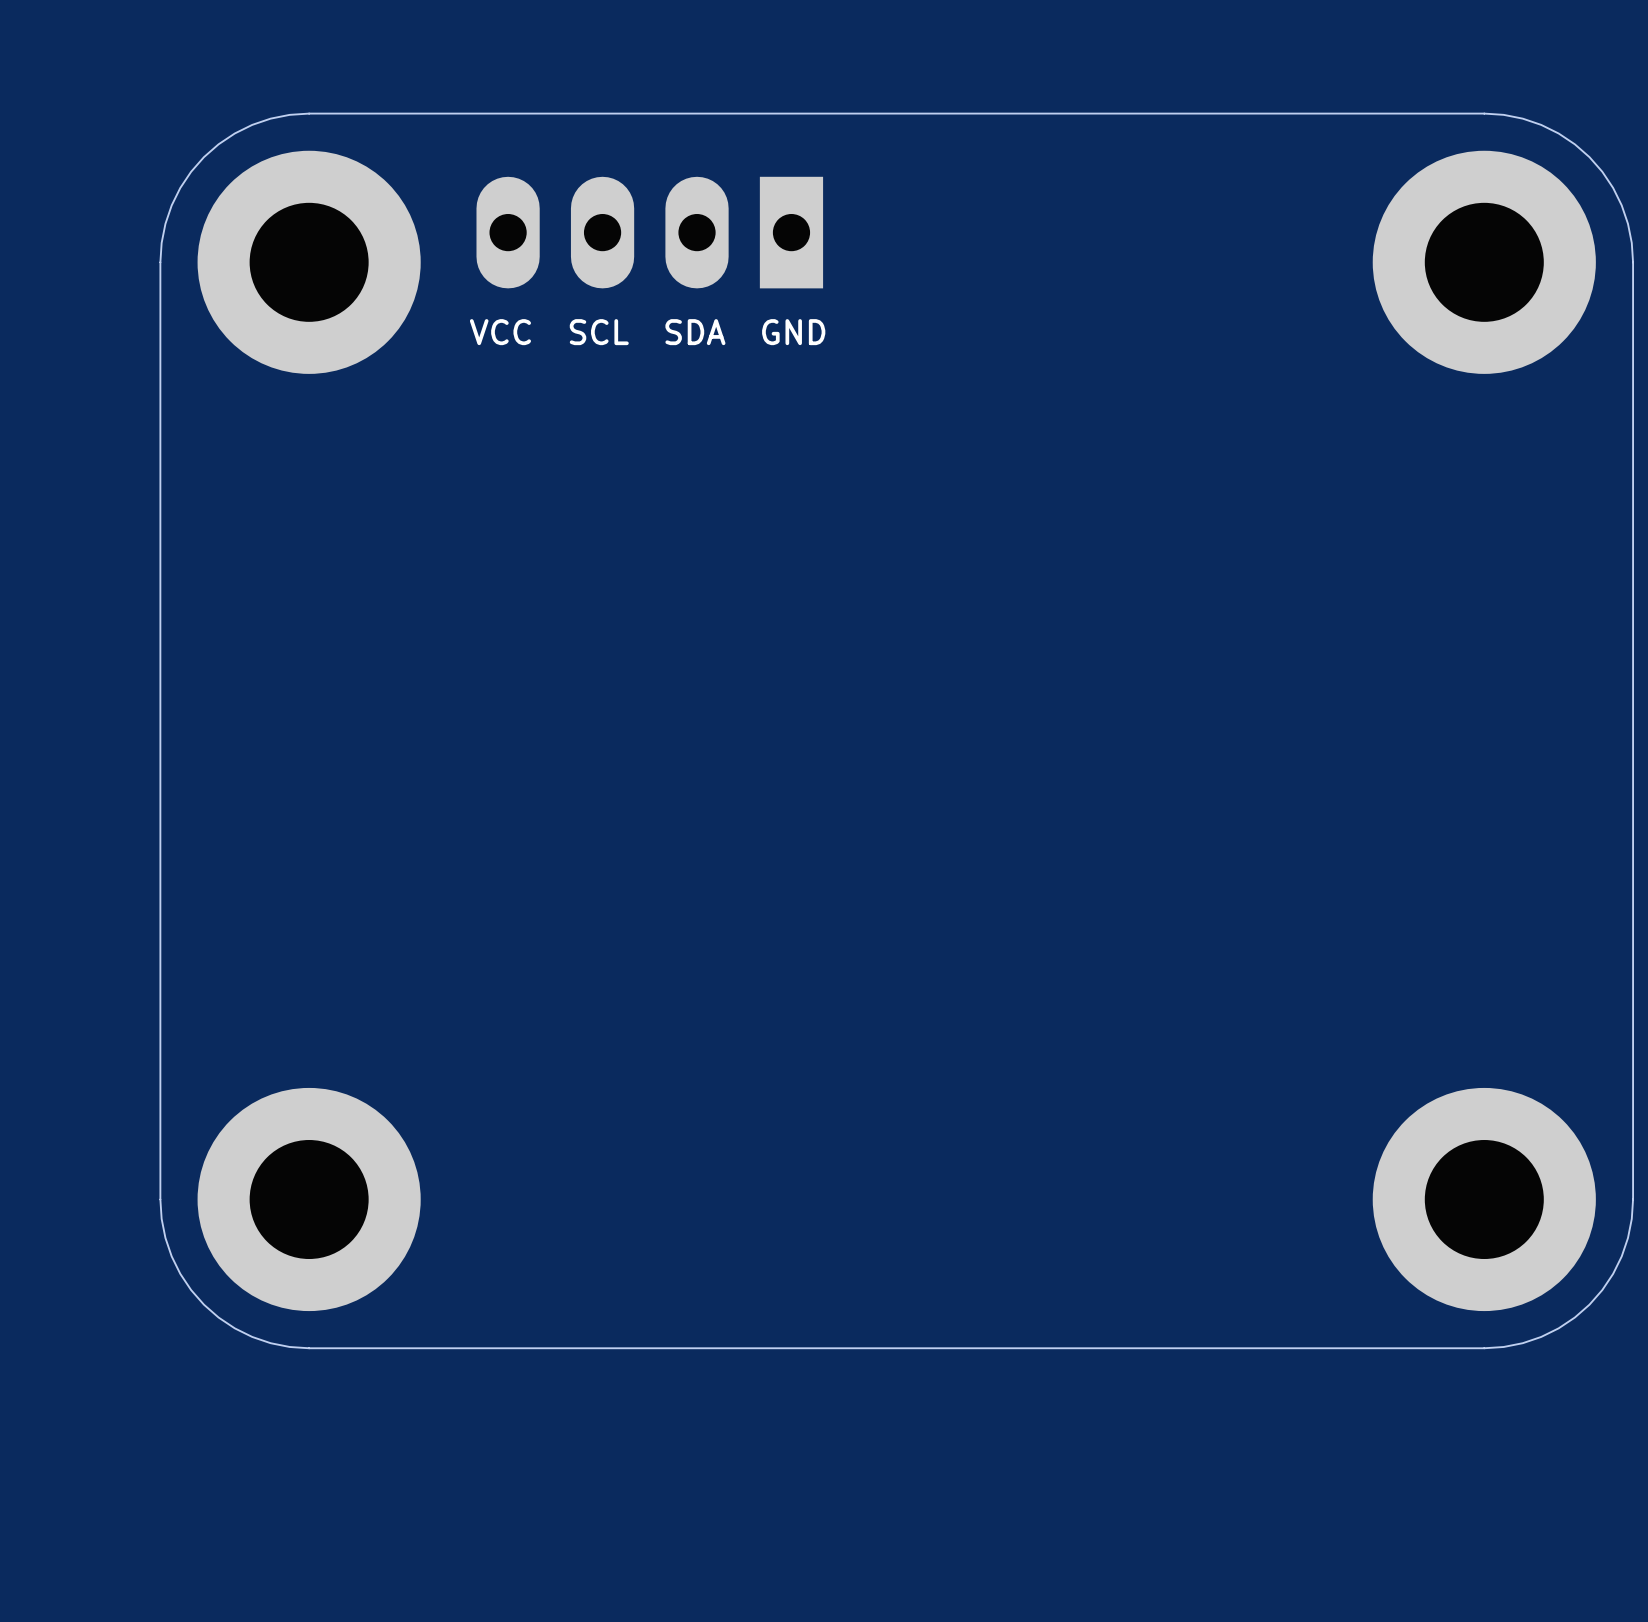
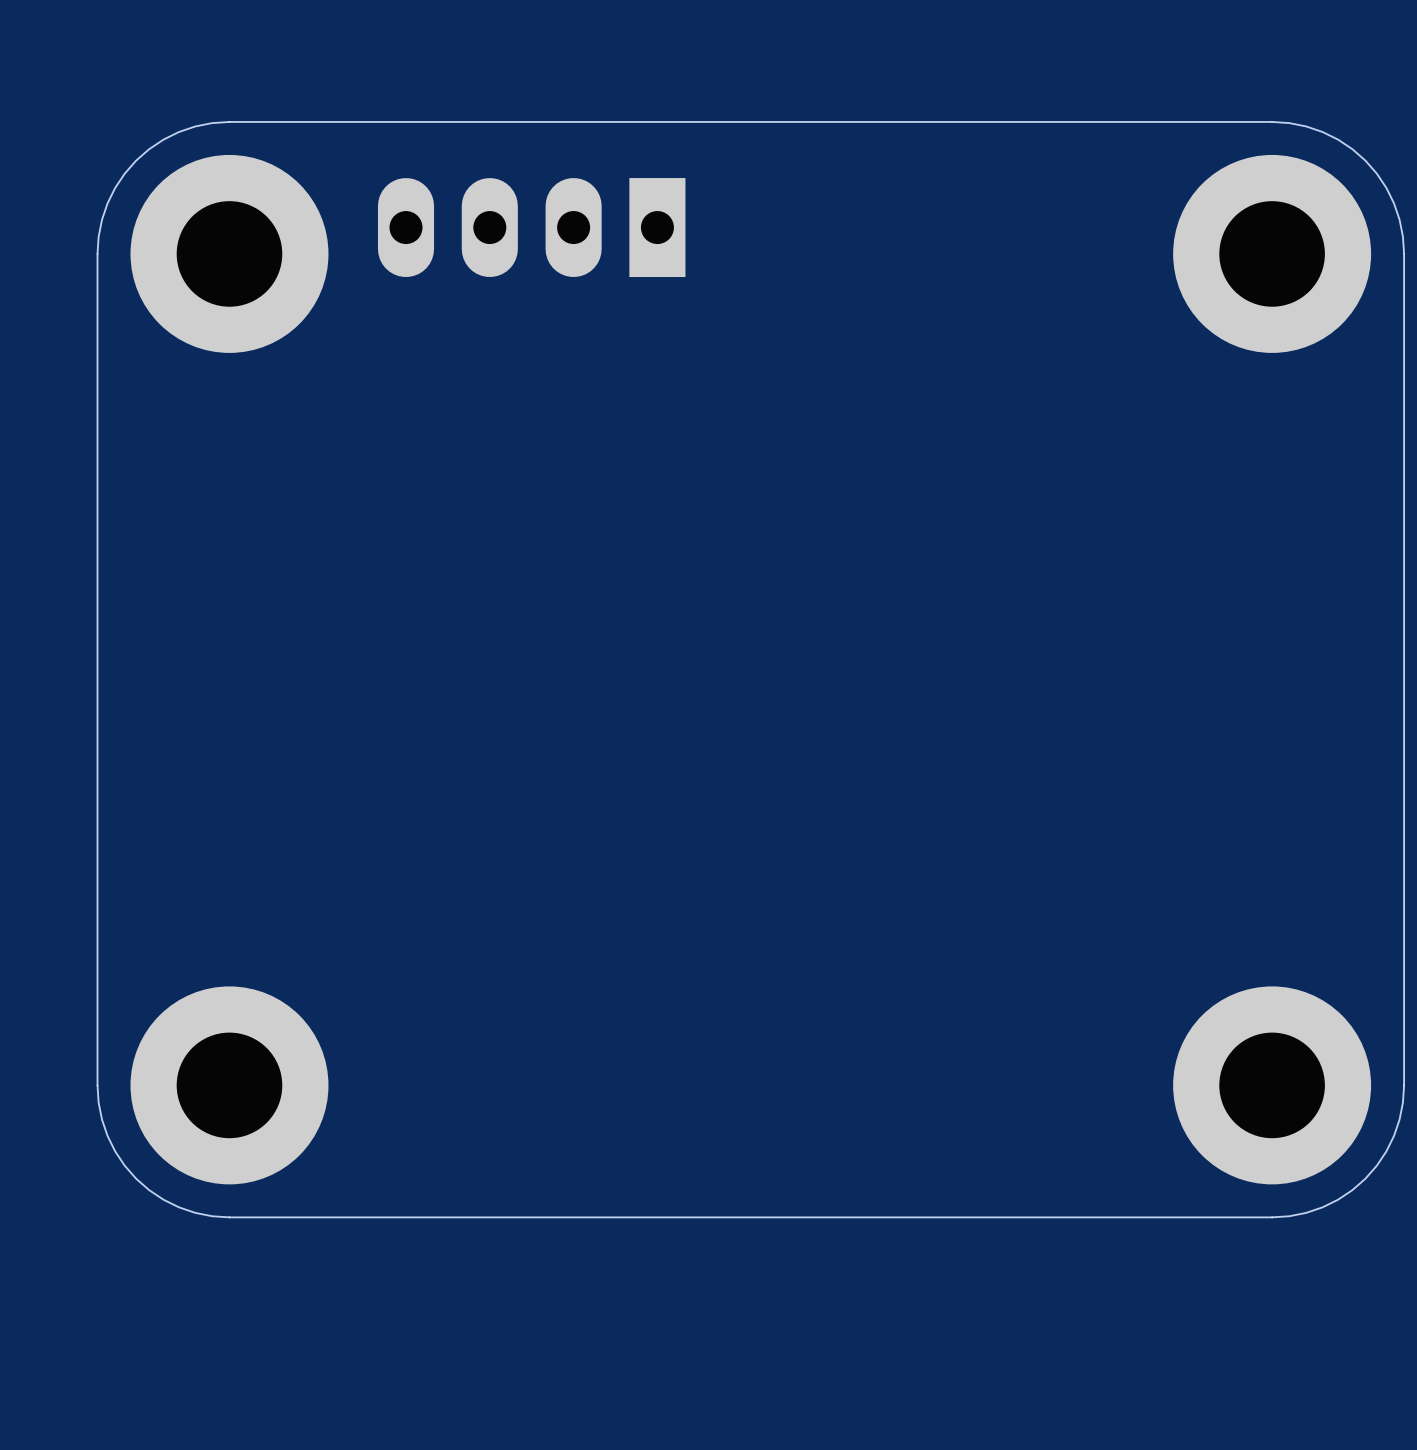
text: VCC SCL SDA GND (647, 332) -> none

